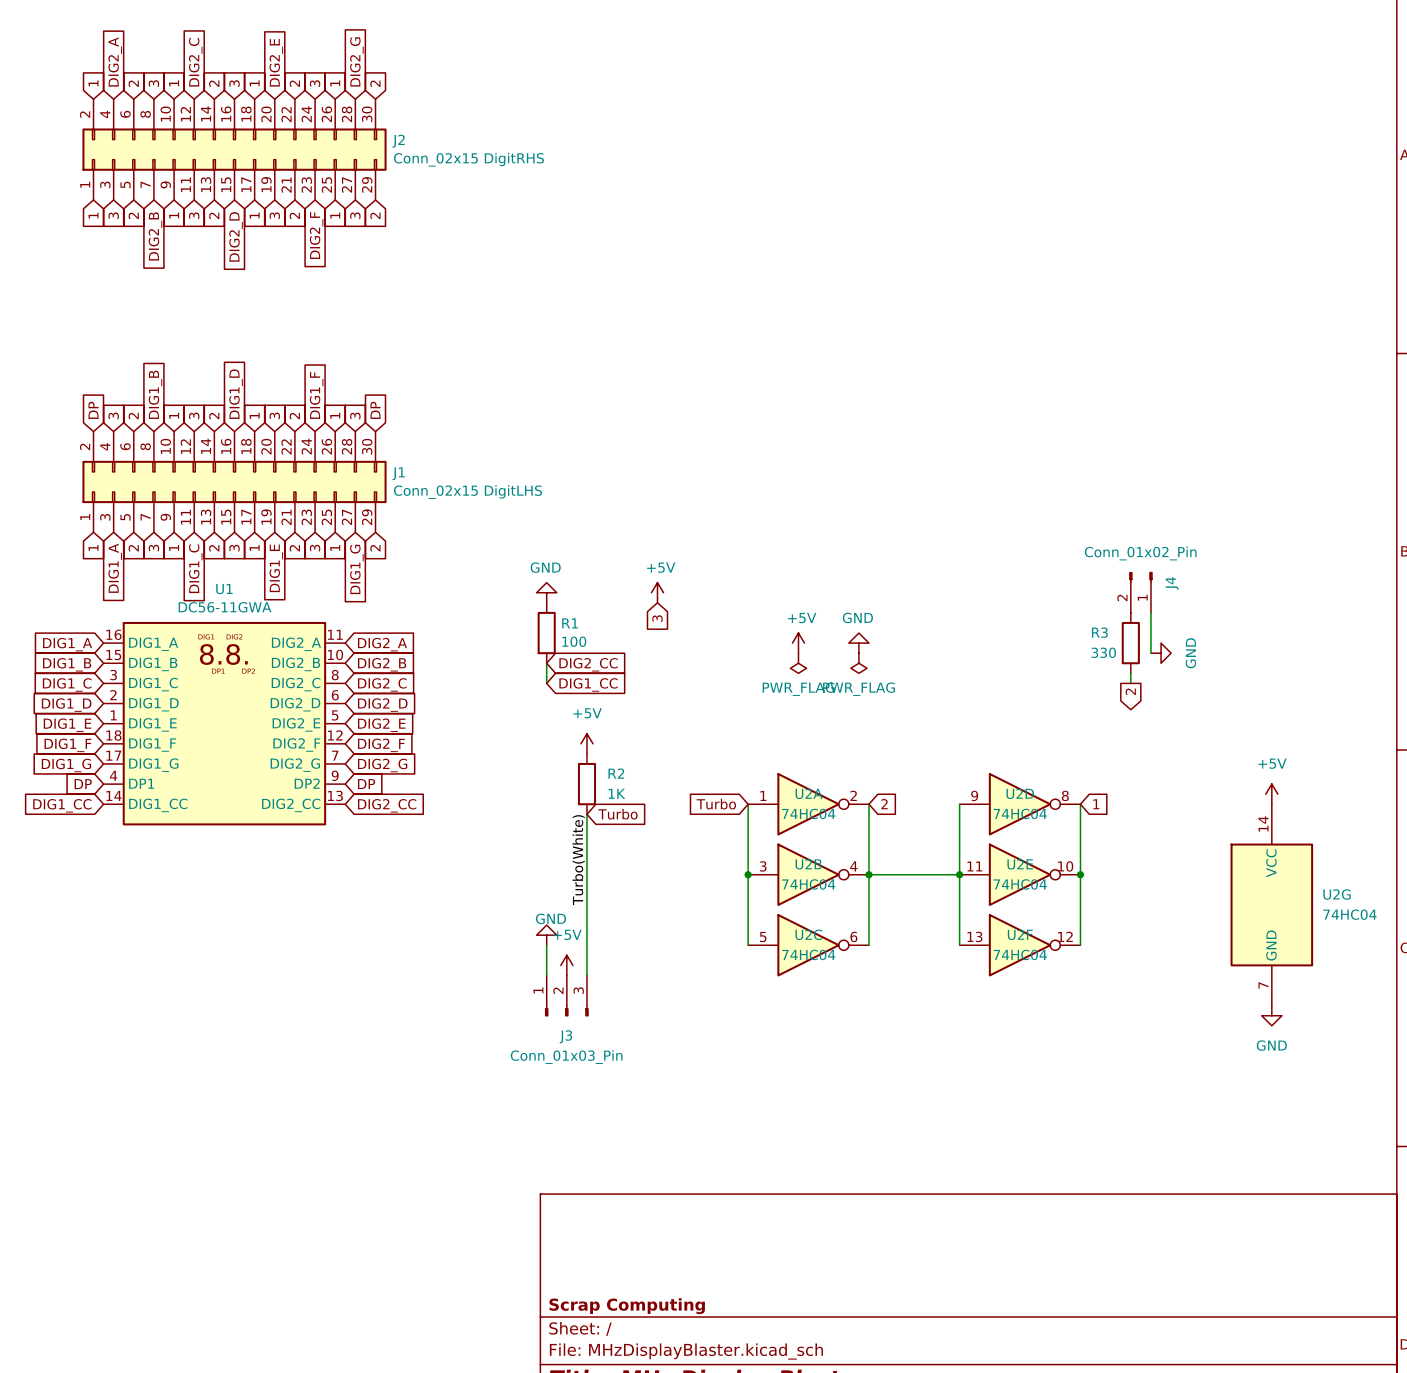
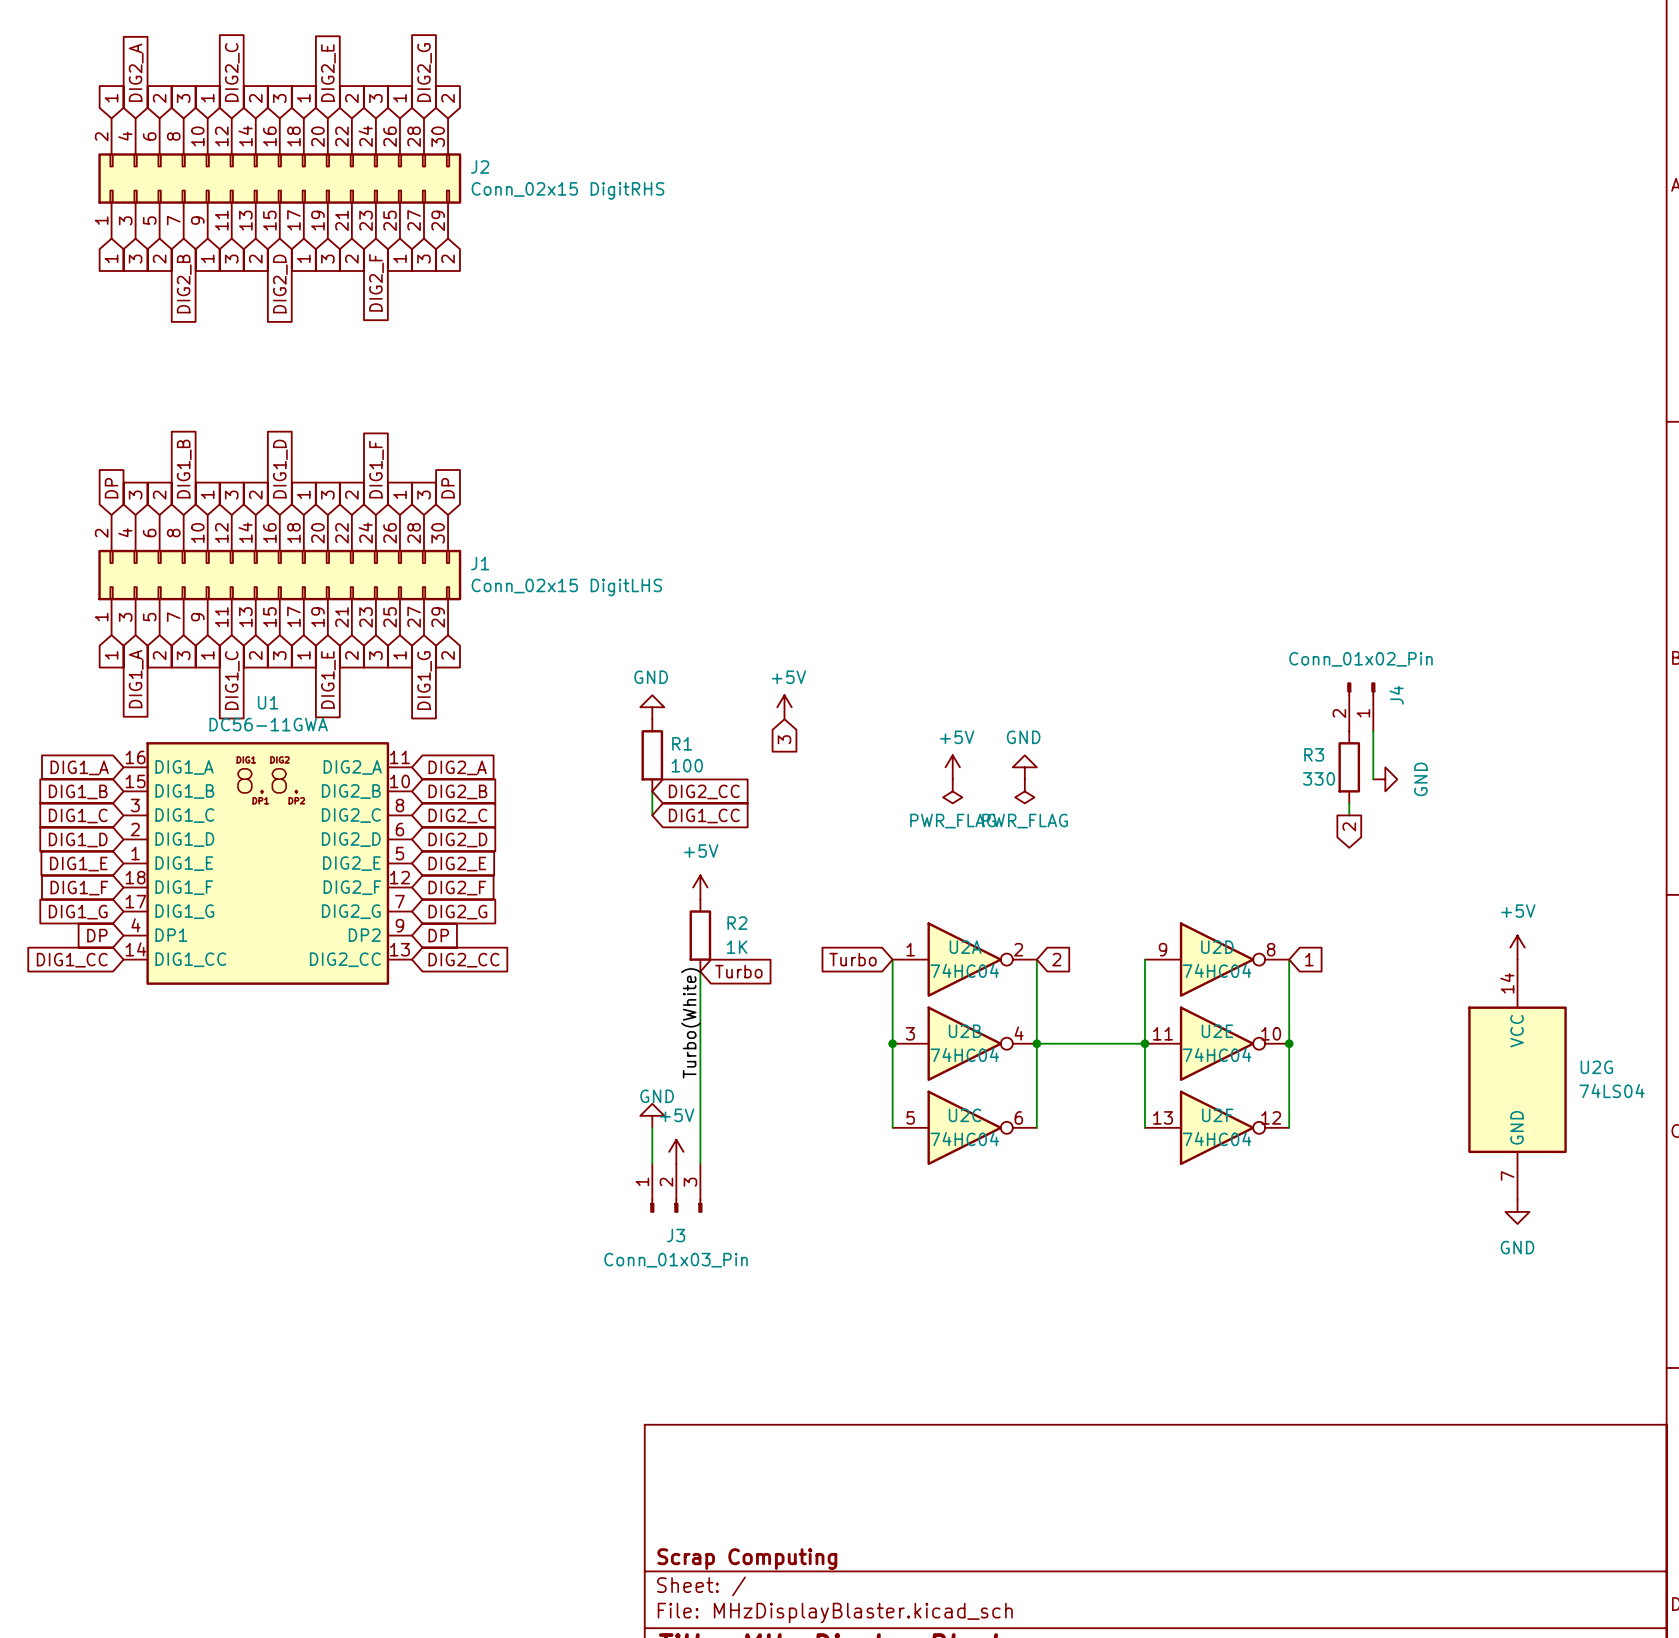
U2G value: 74HC04 (1349, 914) -> 74LS04 (1612, 1091)

